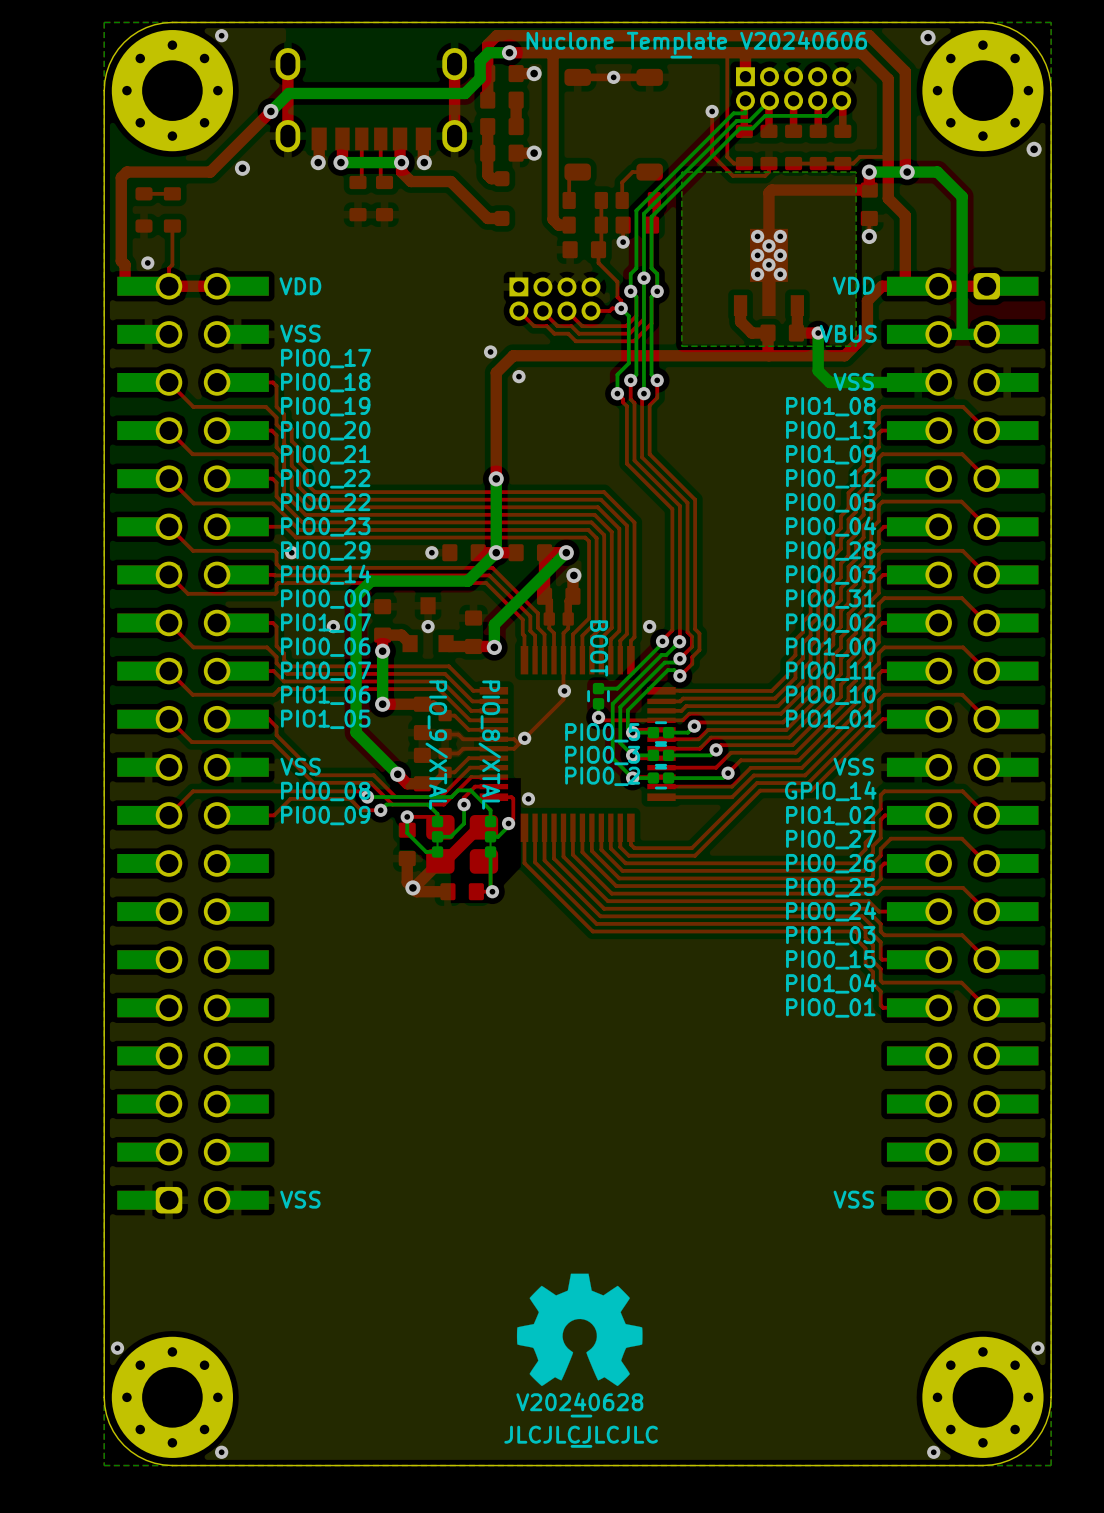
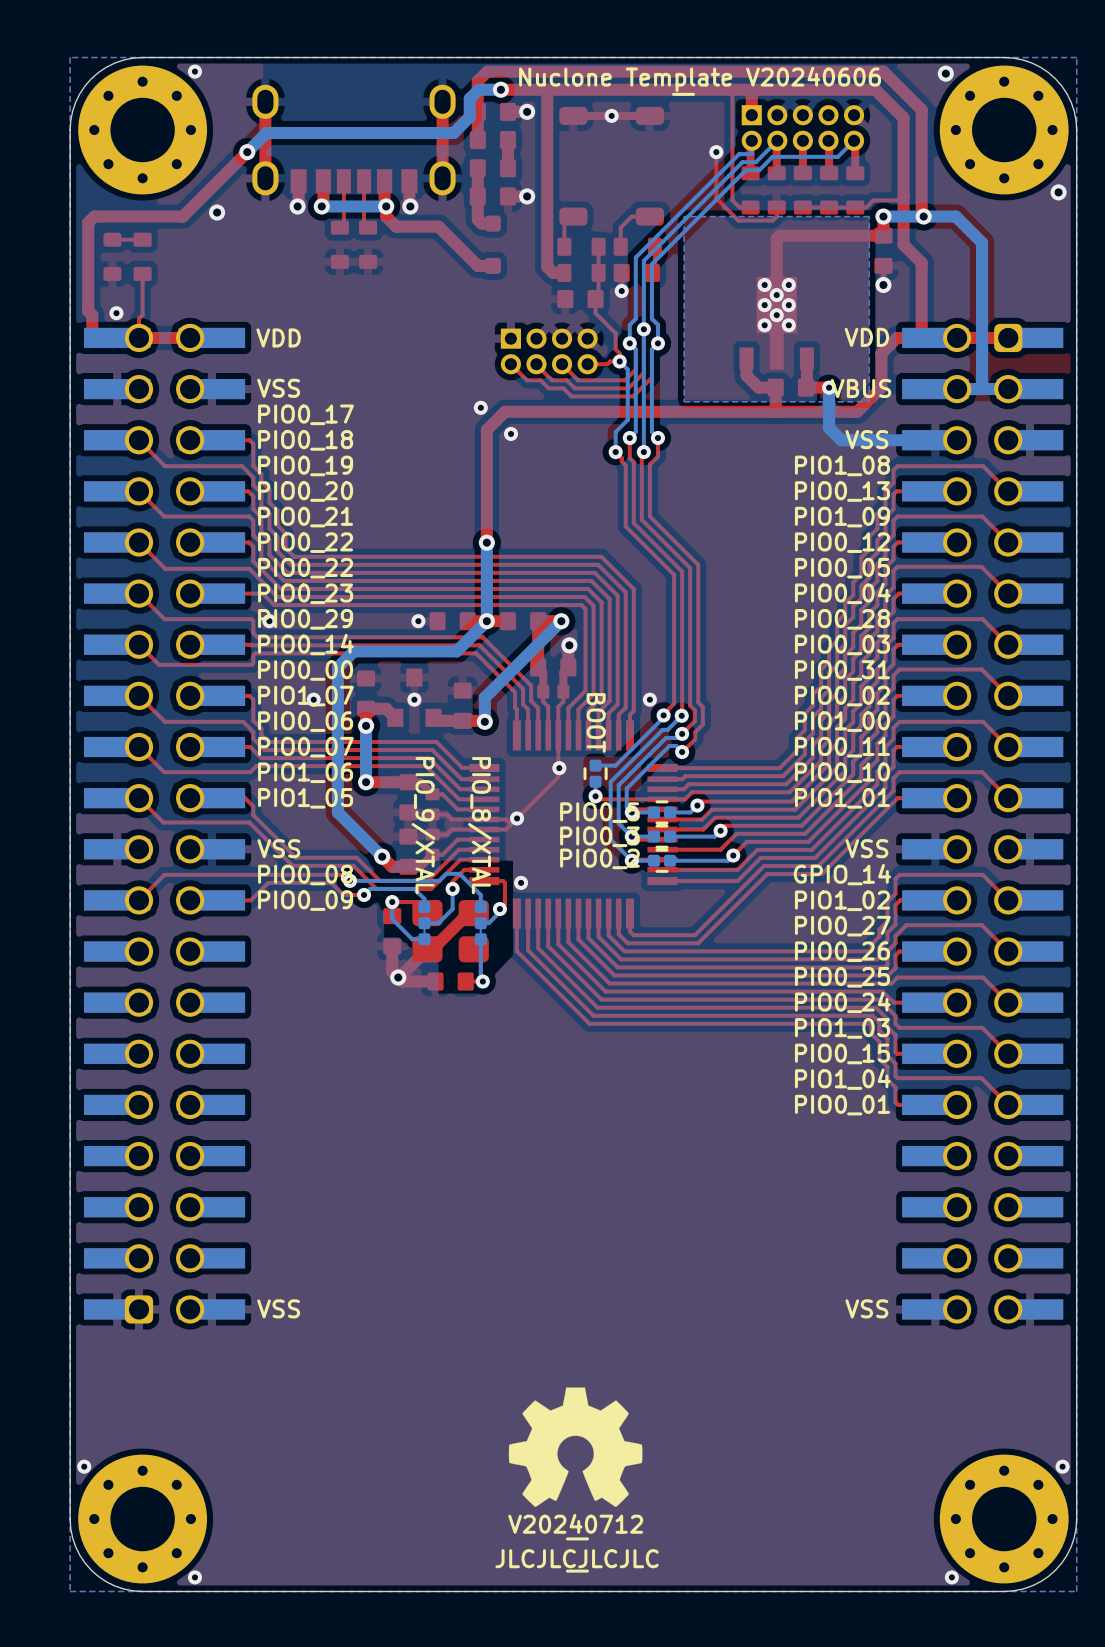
drawing shape: [516, 1392, 644, 1418] -> [508, 1513, 644, 1541]

